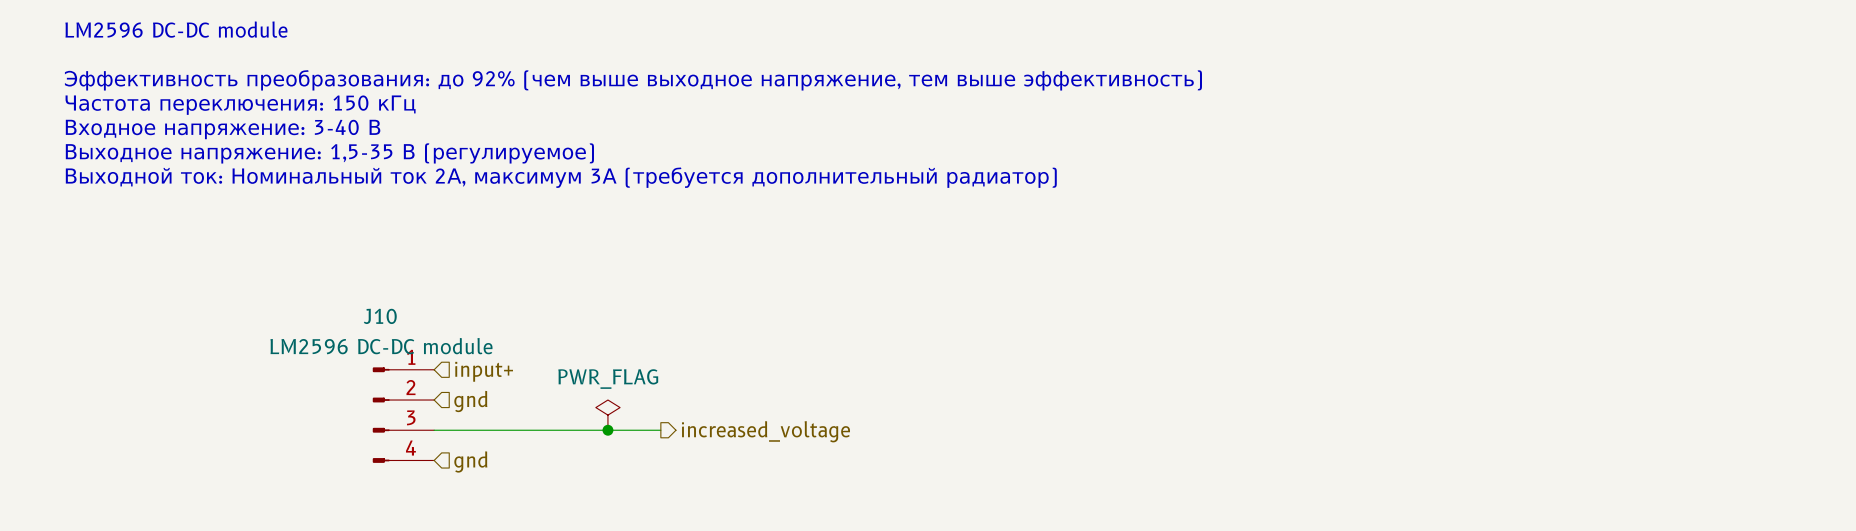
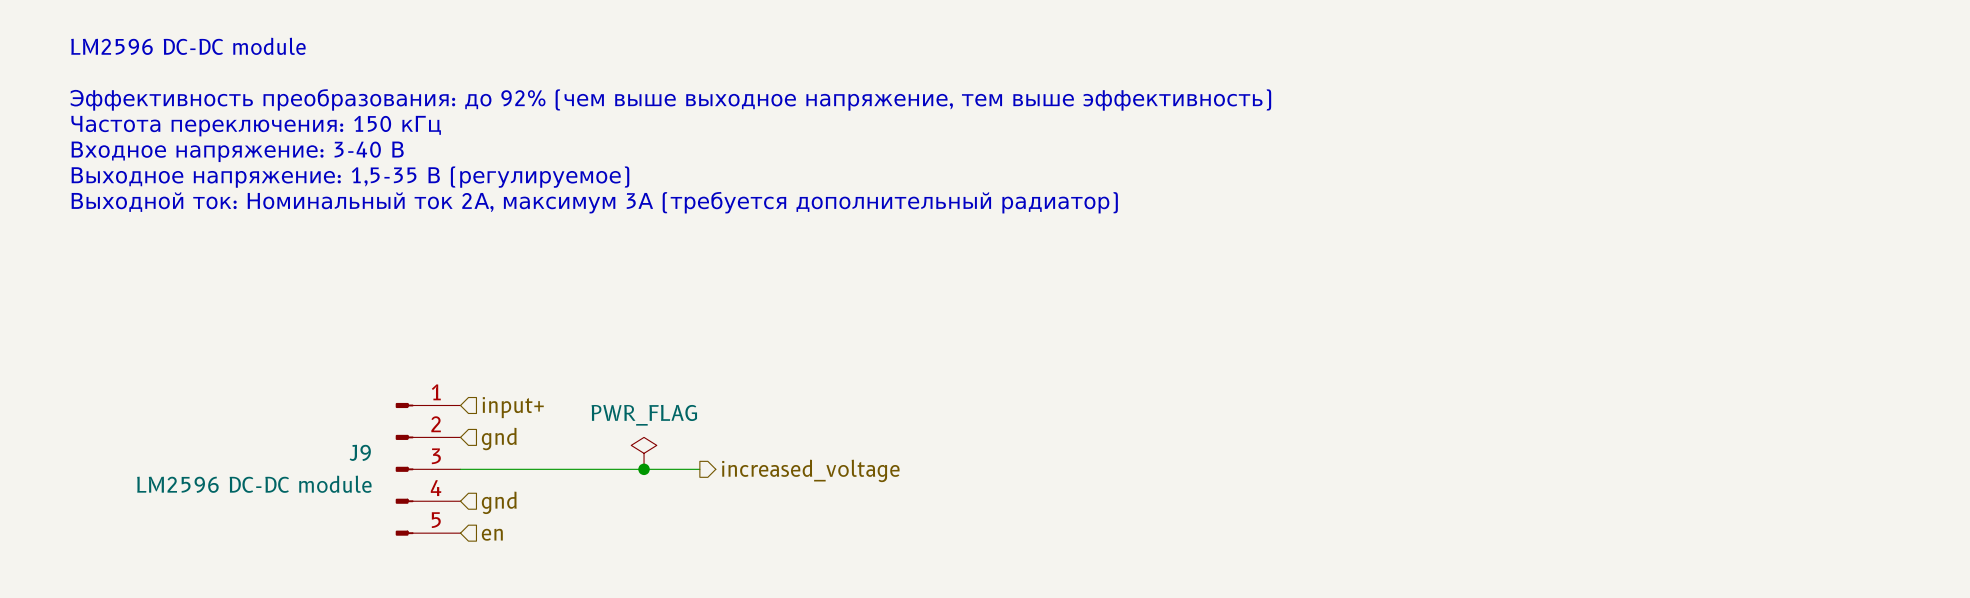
J10: LM2596 DC-DC module (403, 415) -> none
J9: none -> LM2596 DC-DC module (428, 469)
hierarchical label: none -> en (492, 534)

